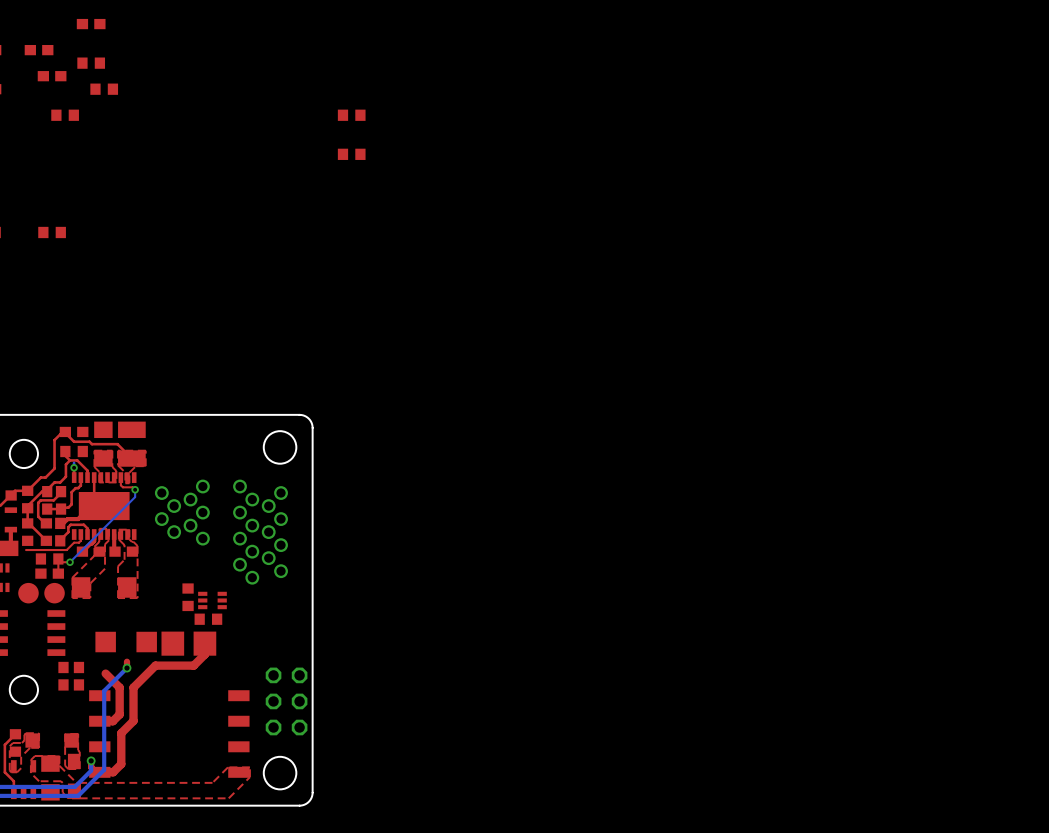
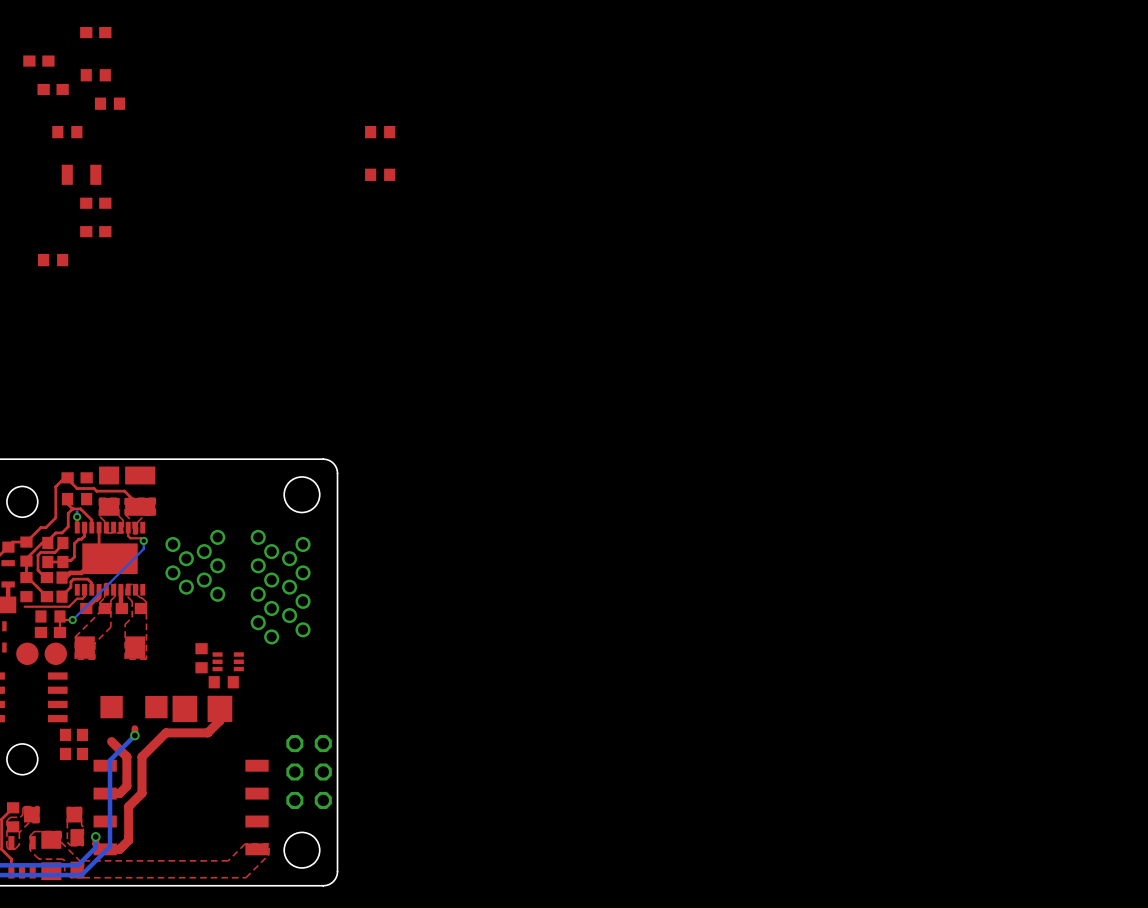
part: none -> (81, 174)
part: none -> (95, 203)
part: none -> (95, 231)

